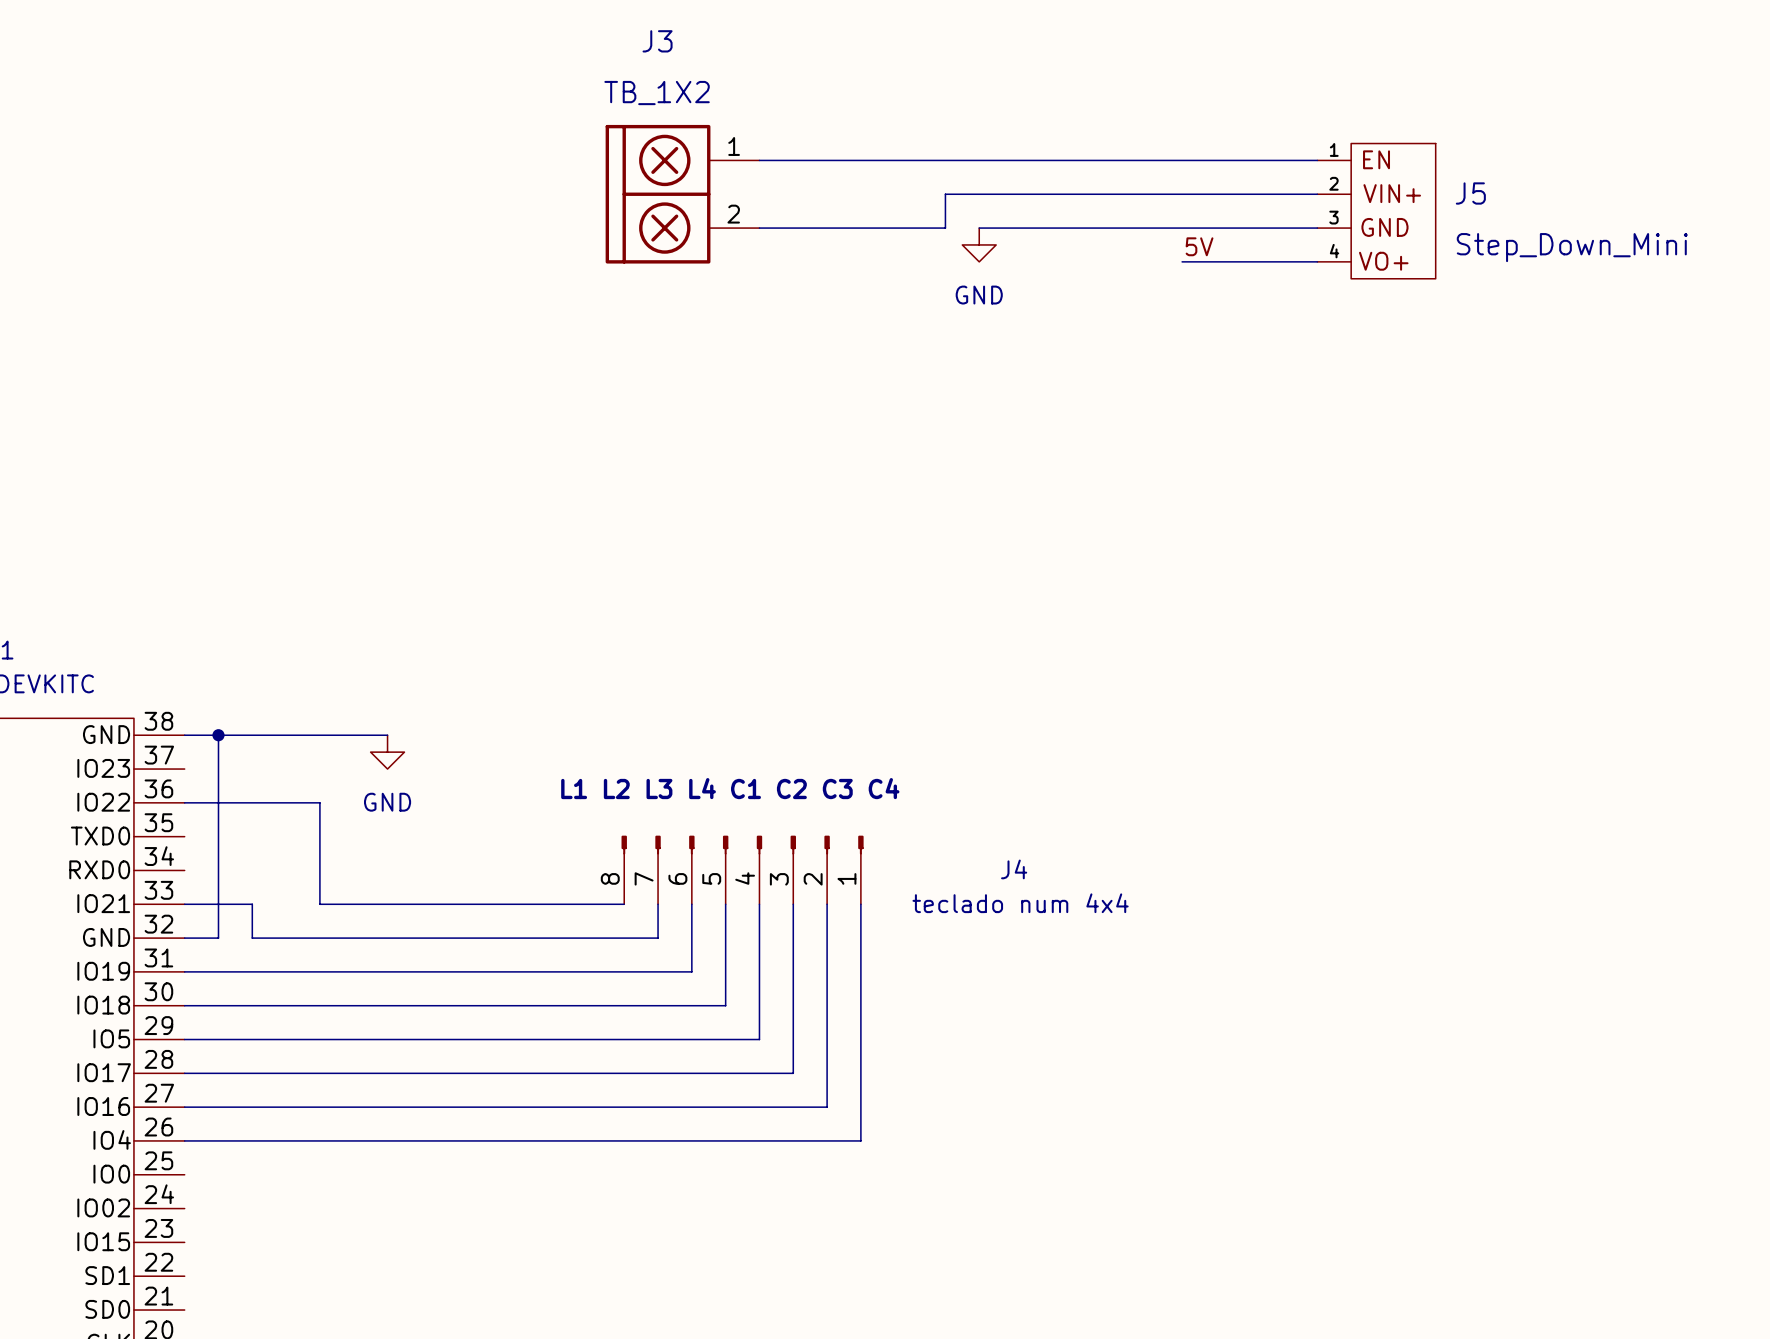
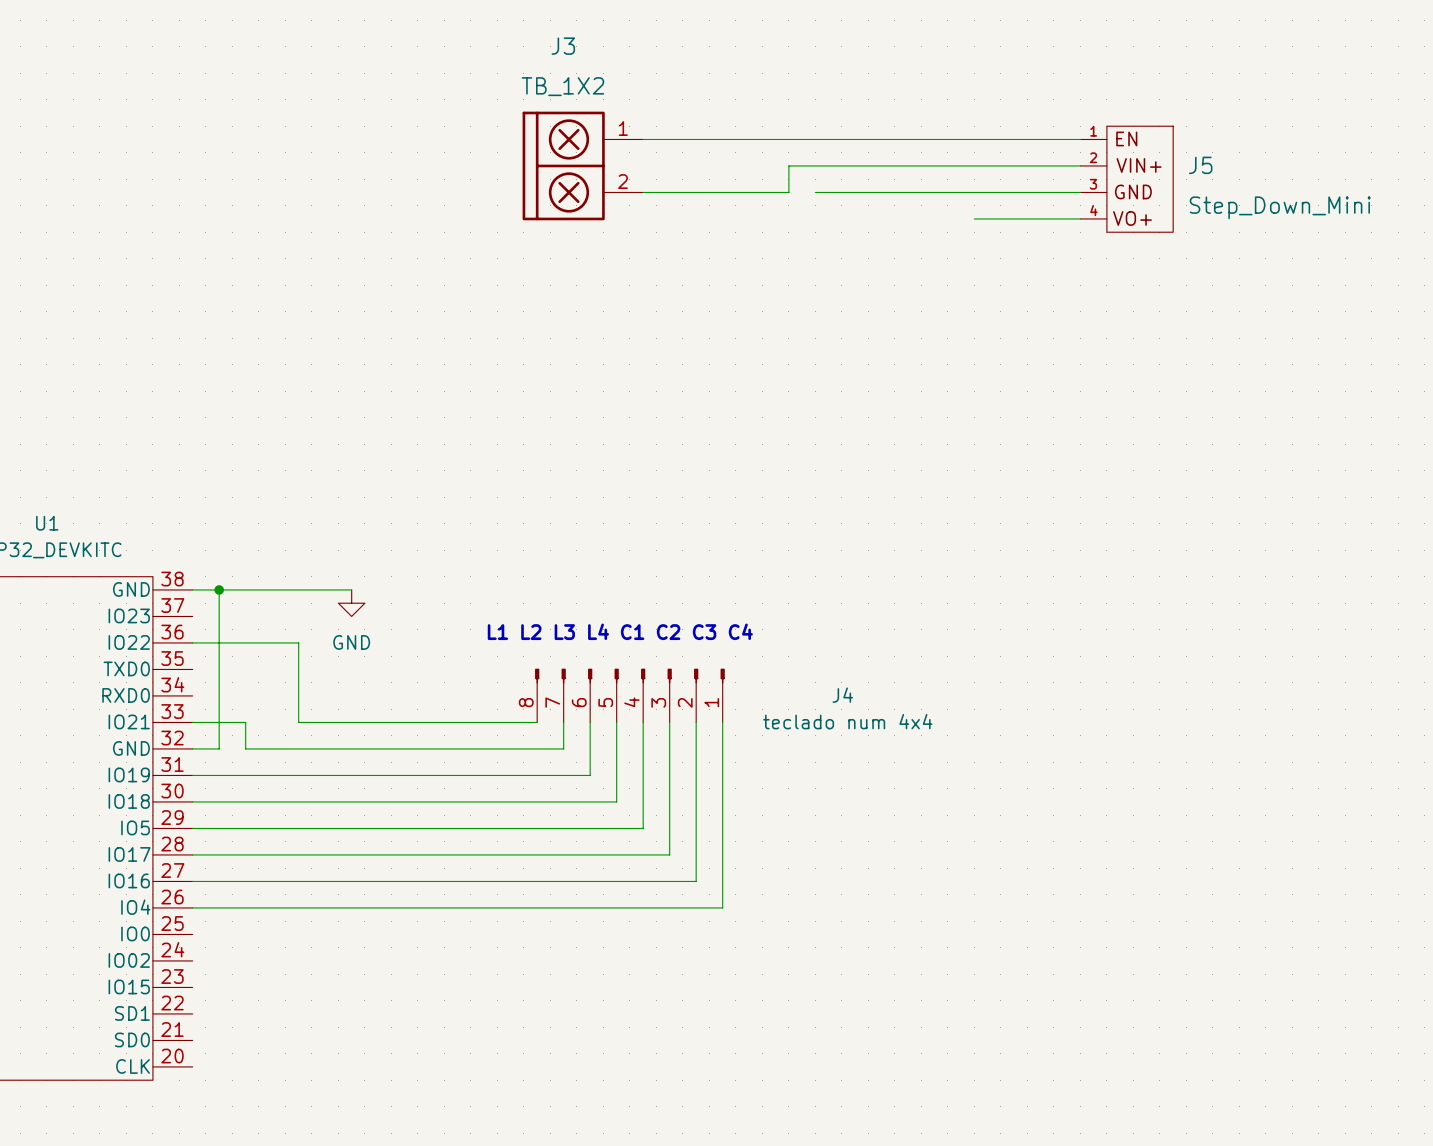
power symbol: GND (979, 244) -> none
label: 5V (1199, 246) -> none

